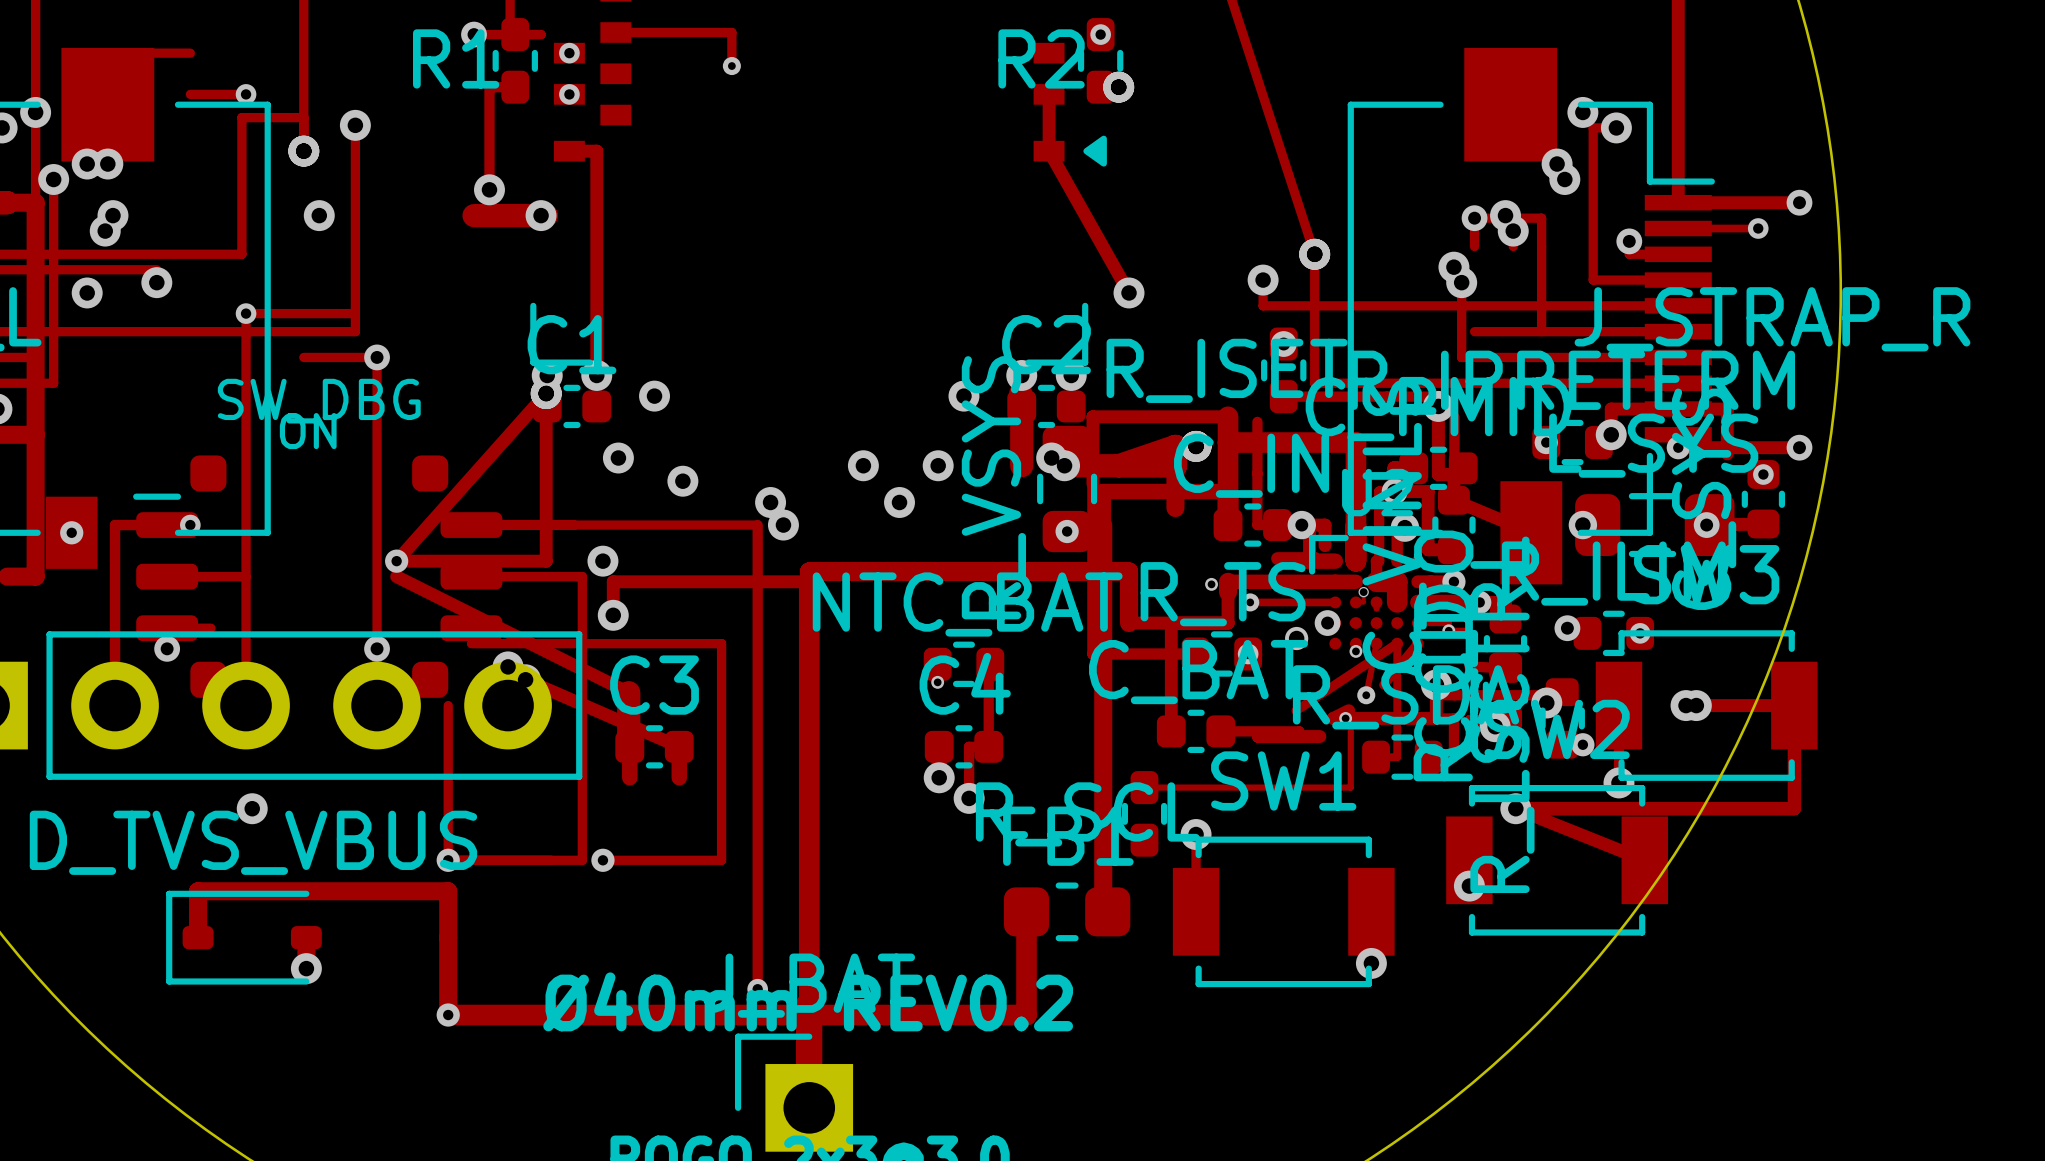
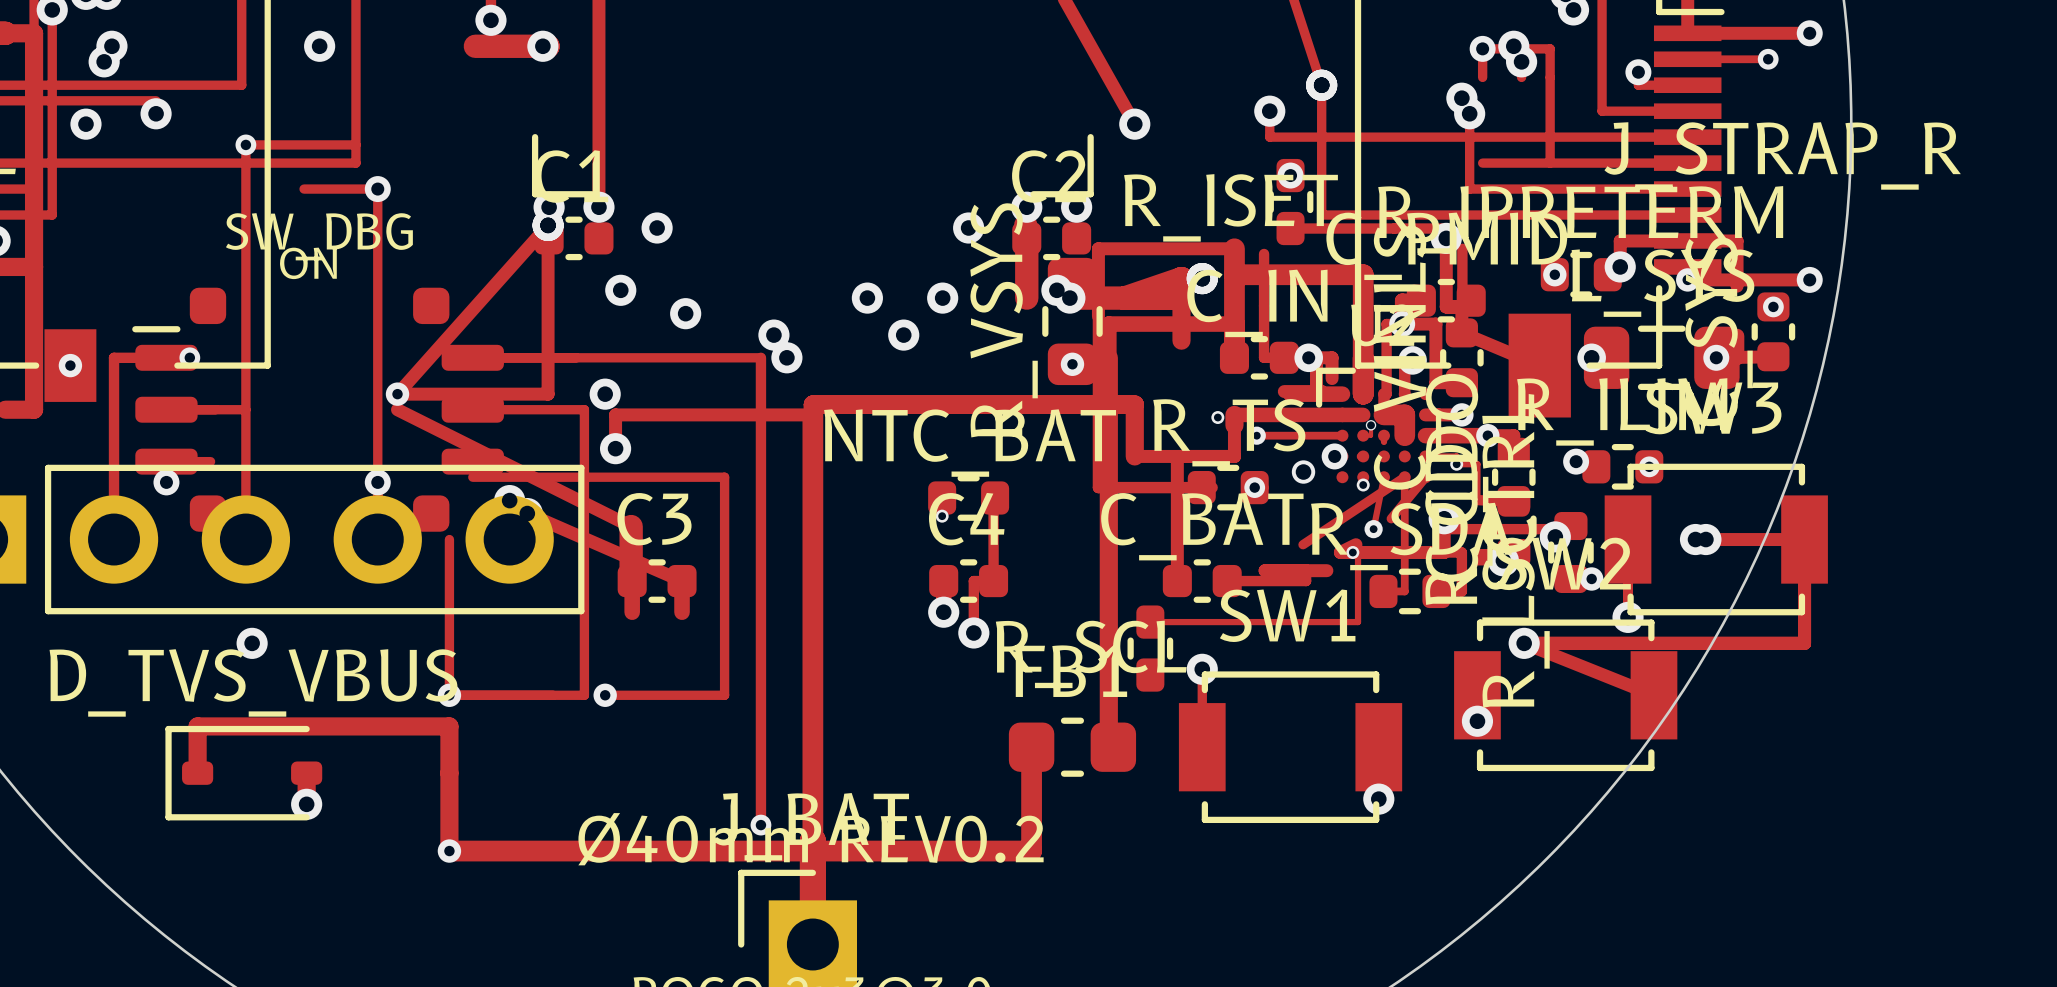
C_BAT position: (1196, 731) -> (1202, 581)
track: (1220, 731) (1299, 731) (1299, 736) -> (1227, 581) (1306, 581) (1306, 570)

